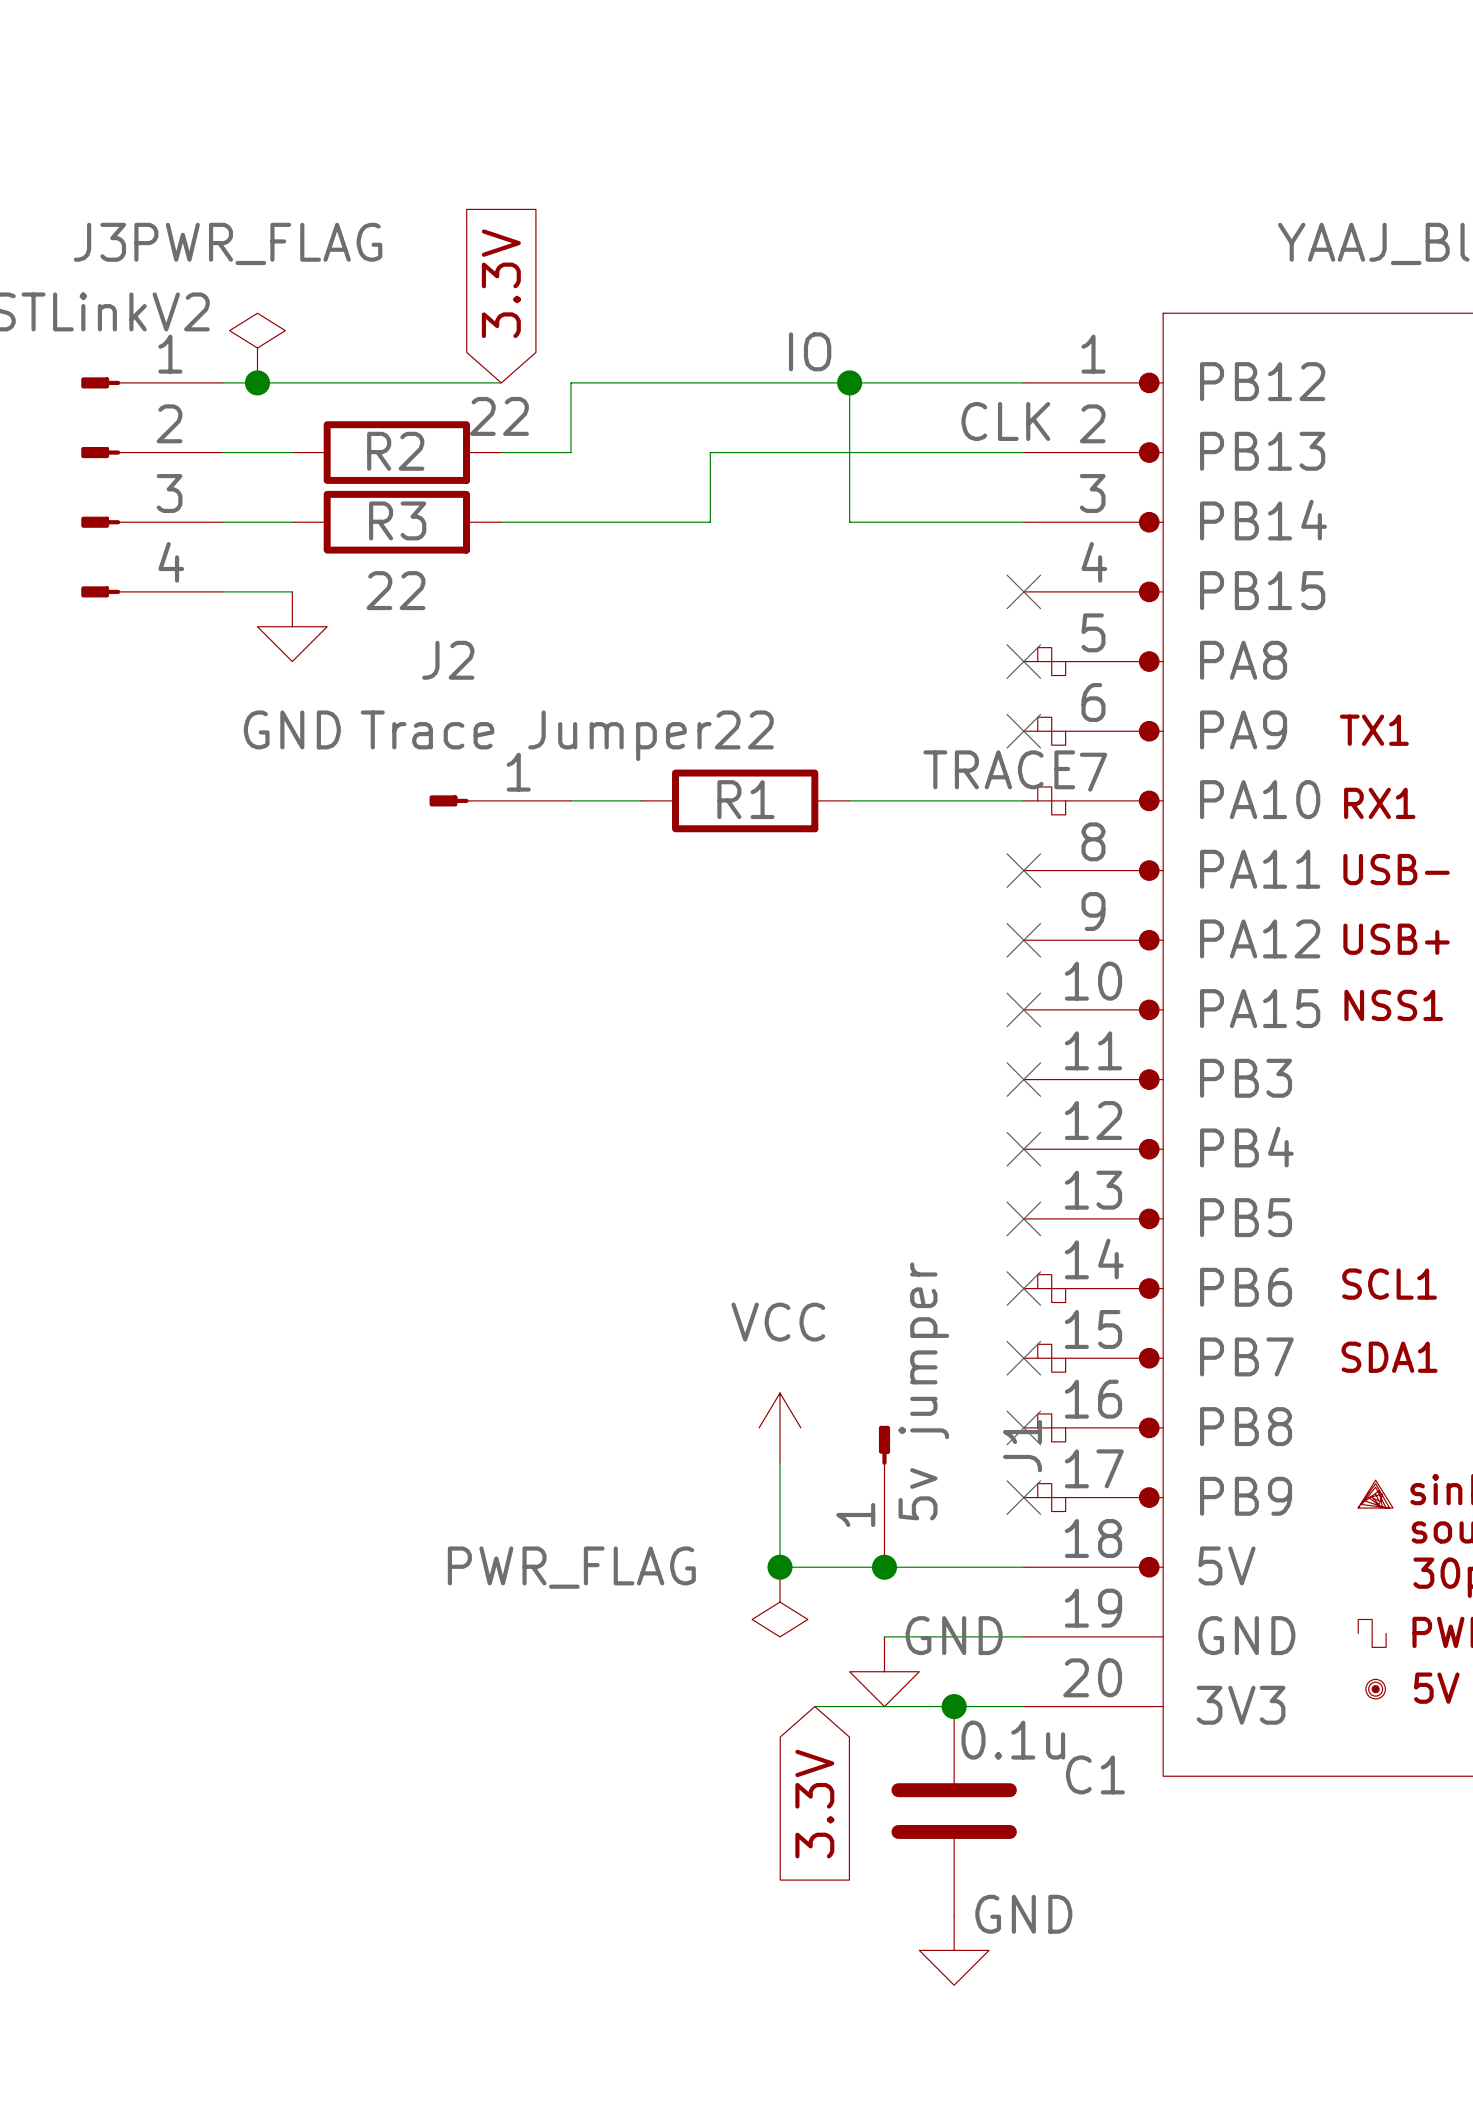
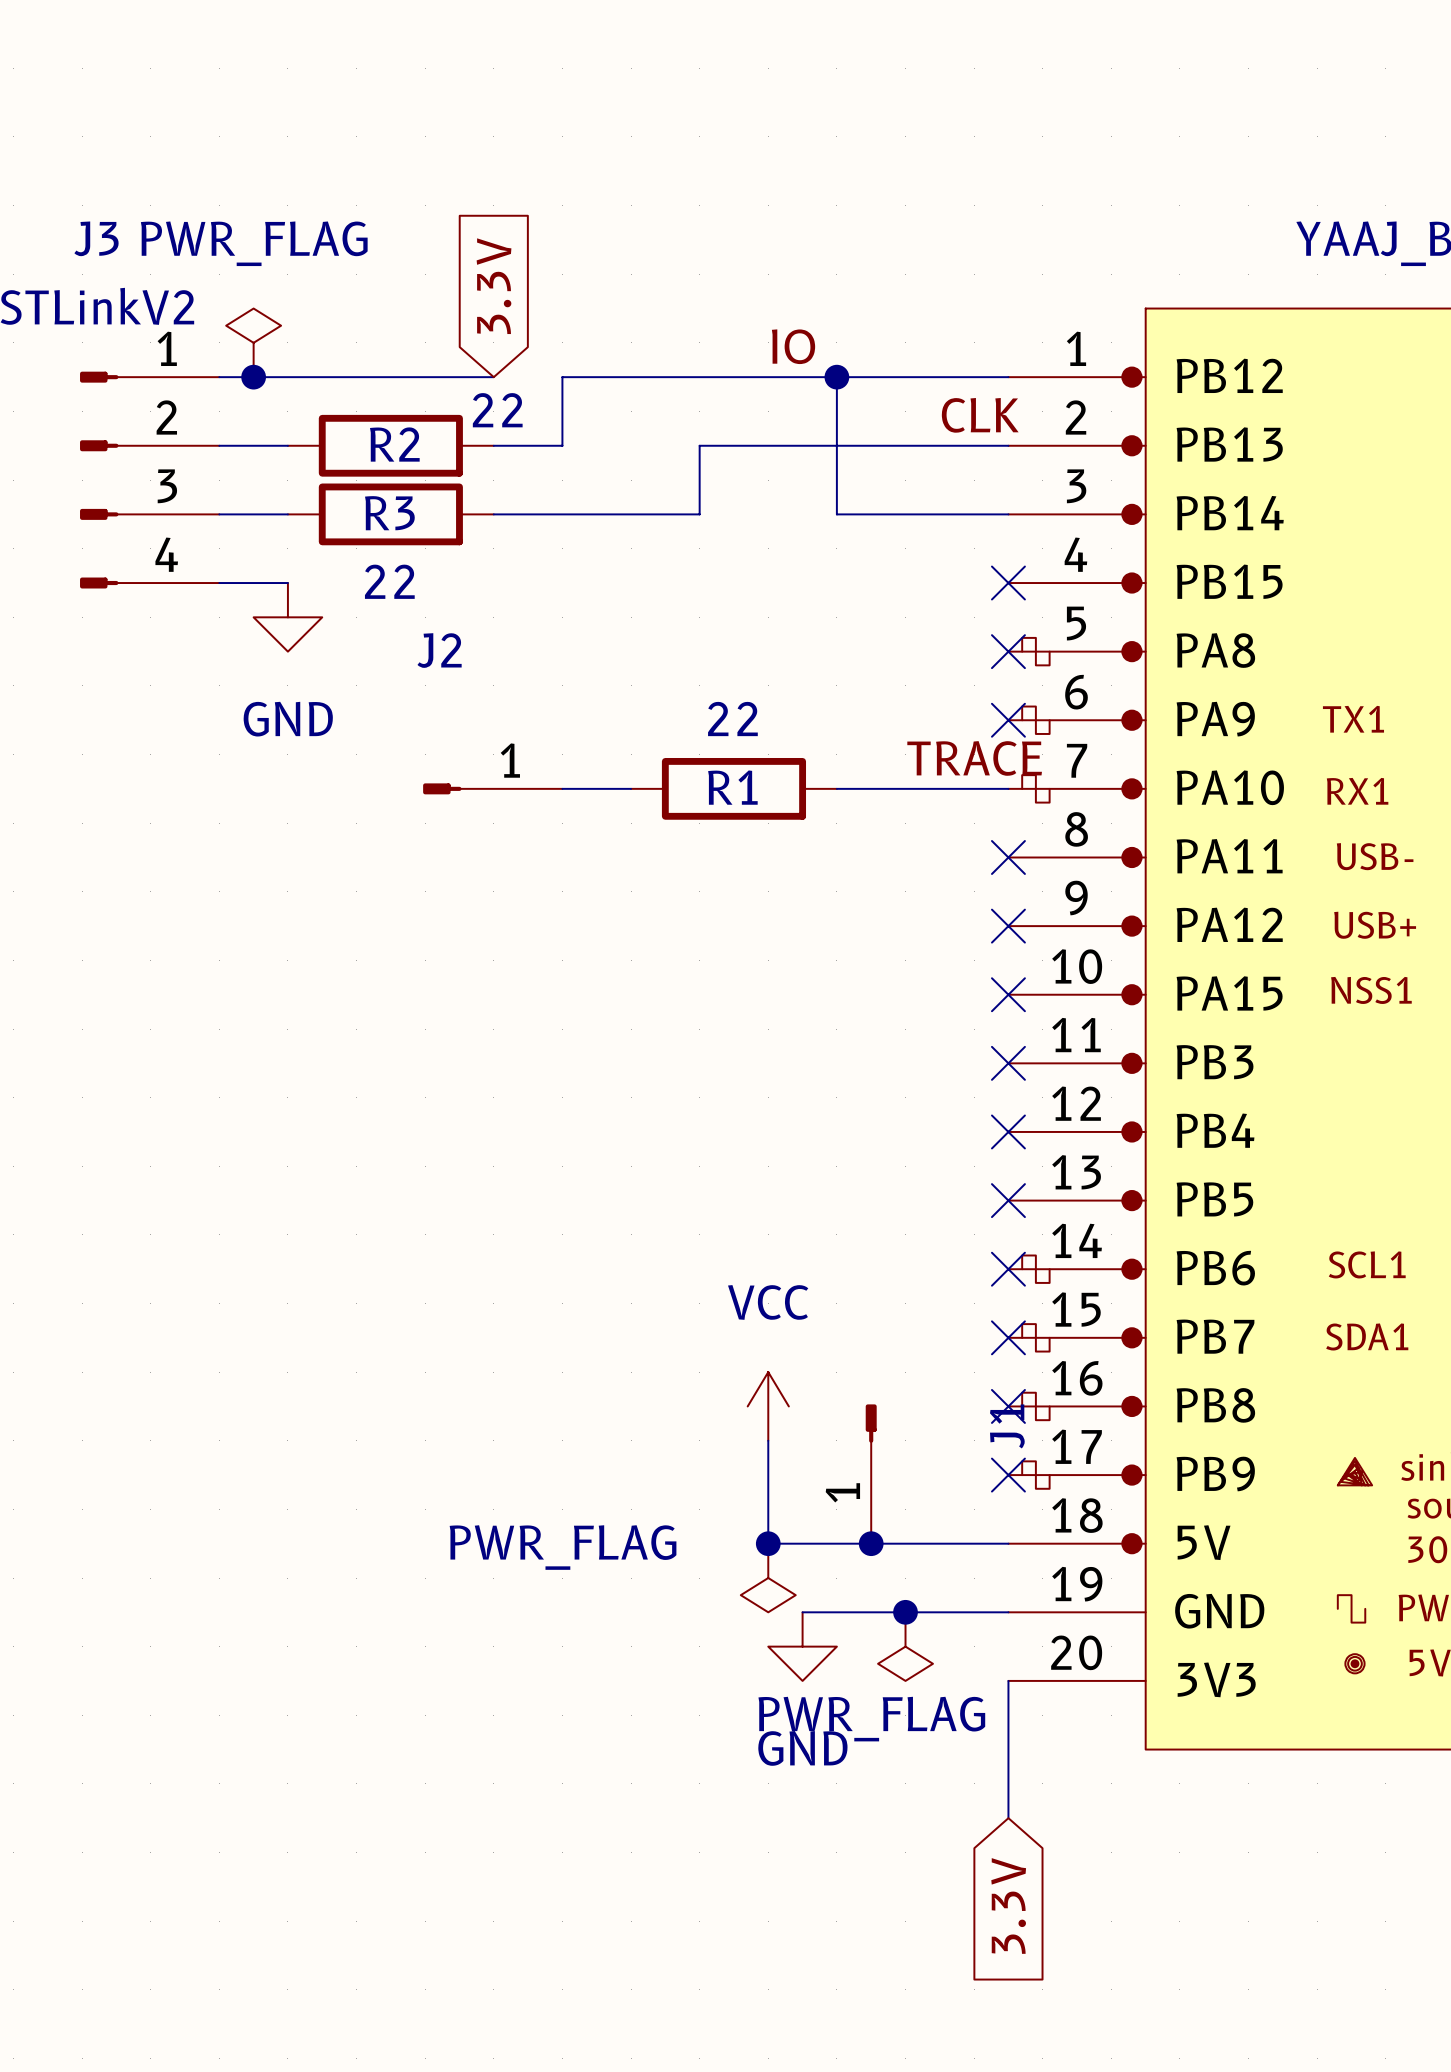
J2 value: Trace Jumper (536, 735) -> none
J1 value: 5v jumper (923, 1391) -> none
power symbol text position: GND (954, 1635) -> GND (802, 1748)
wire: none -> (802, 1612) (871, 1612)
power symbol position: GND (884, 1671) -> GND (802, 1646)
power symbol: none -> PWR_FLAG (905, 1646)
wire: (814, 1706) (1023, 1706) -> (1008, 1818) (1008, 1680)
junction position: (954, 1706) -> (905, 1612)
global label position: 3.3V (814, 1804) -> 3.3V (1008, 1905)
C1: 0.1u (954, 1811) -> none
power symbol: GND (954, 1950) -> none

